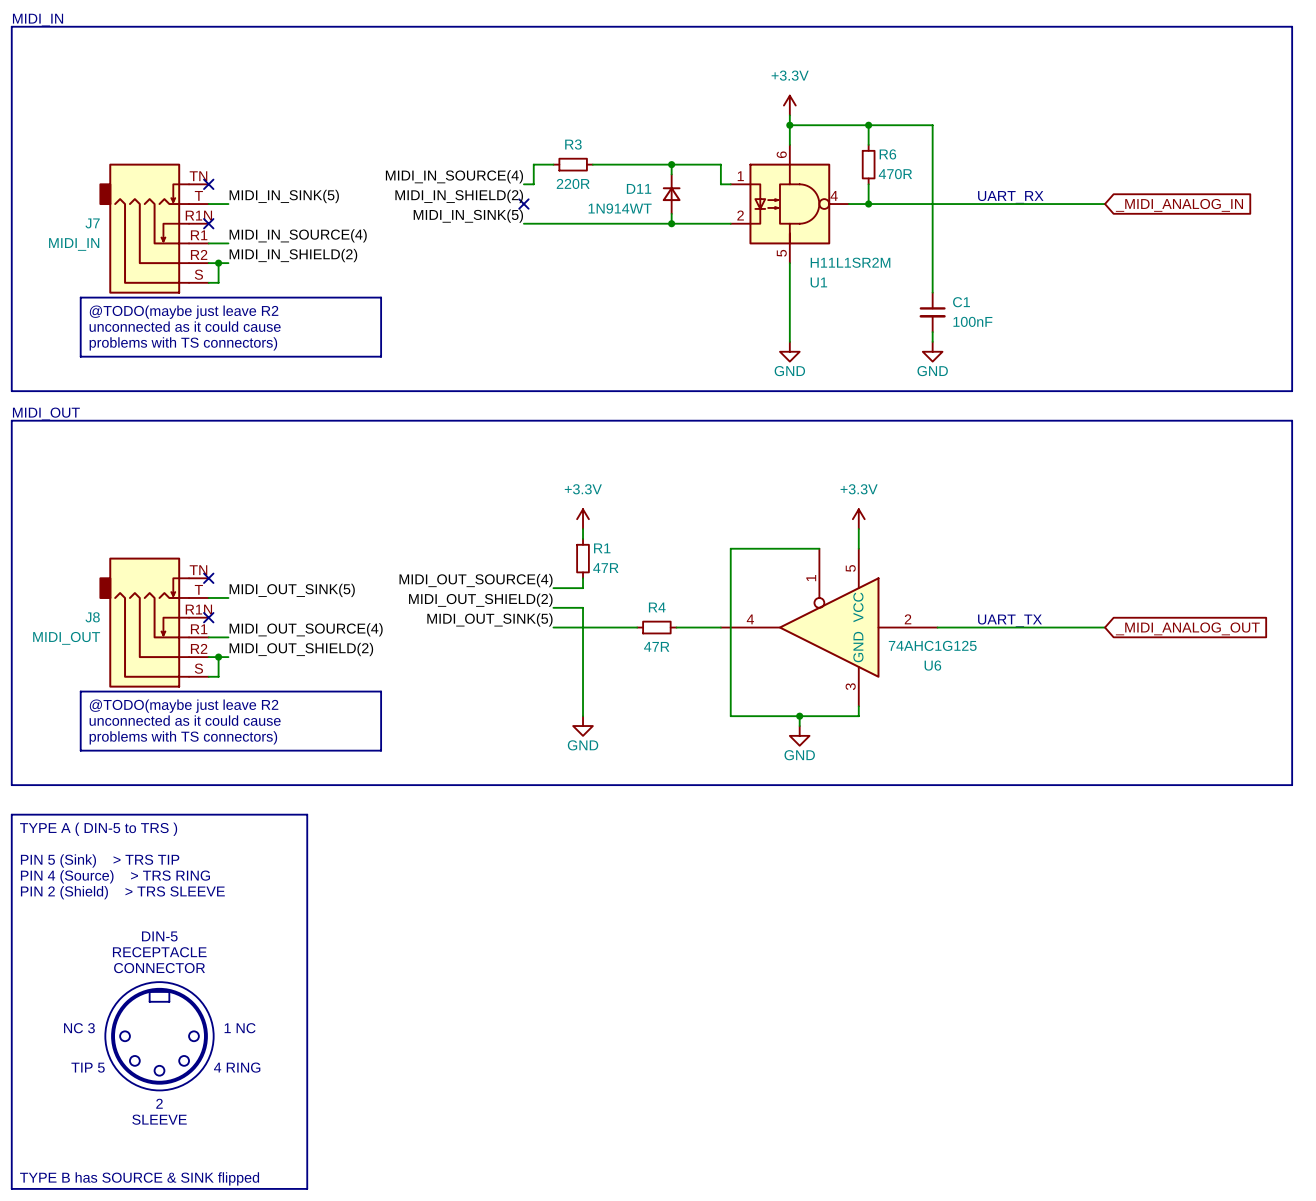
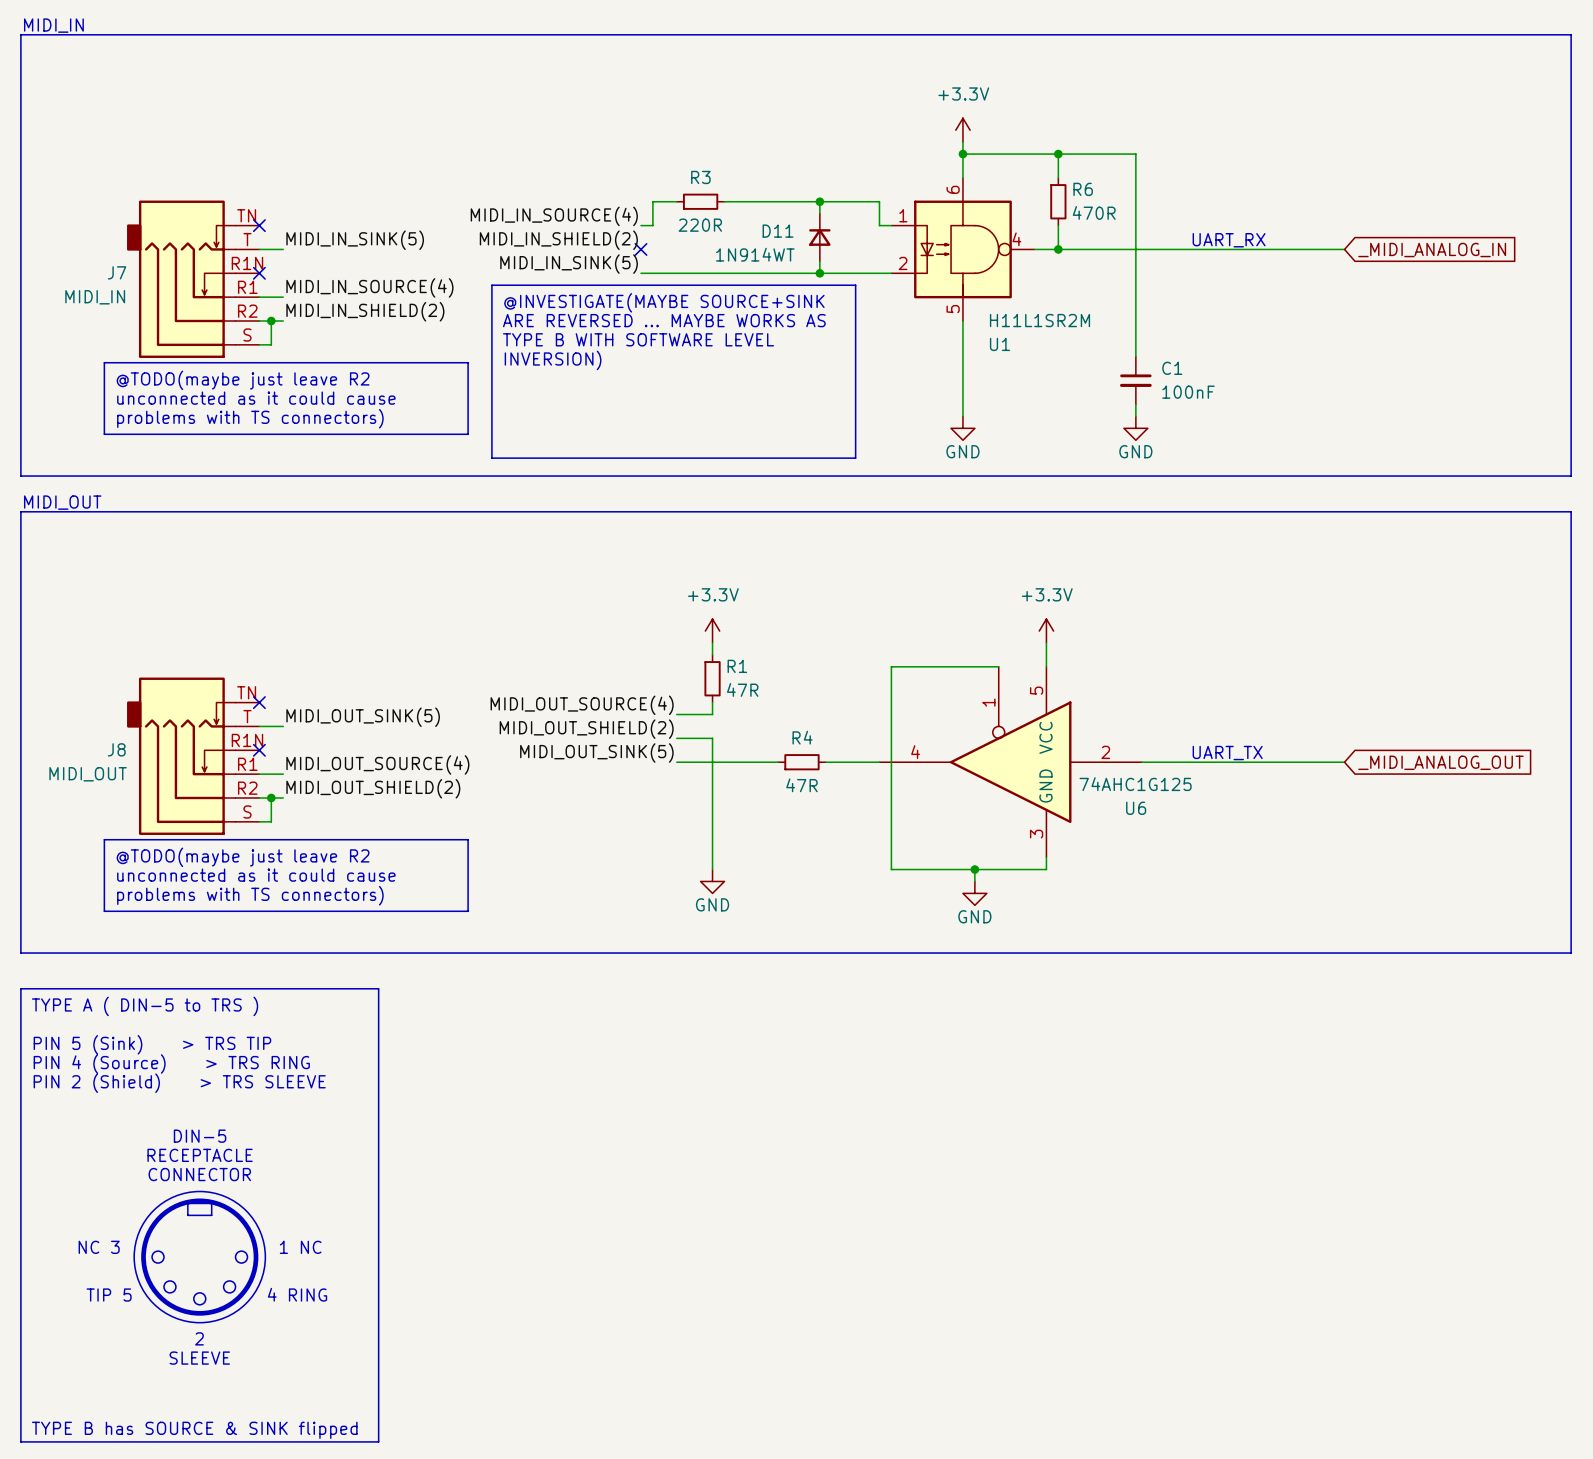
line: none -> (491, 285) (855, 285) (855, 458) (491, 458) (491, 285)
text: none -> @INVESTIGATE(MAYBE SOURCE+SINK (664, 302)
text: none -> ARE REVERSED … MAYBE WORKS AS (664, 320)
text: none -> TYPE B WITH SOFTWARE LEVEL (638, 339)
text: none -> INVERSION) (553, 360)

